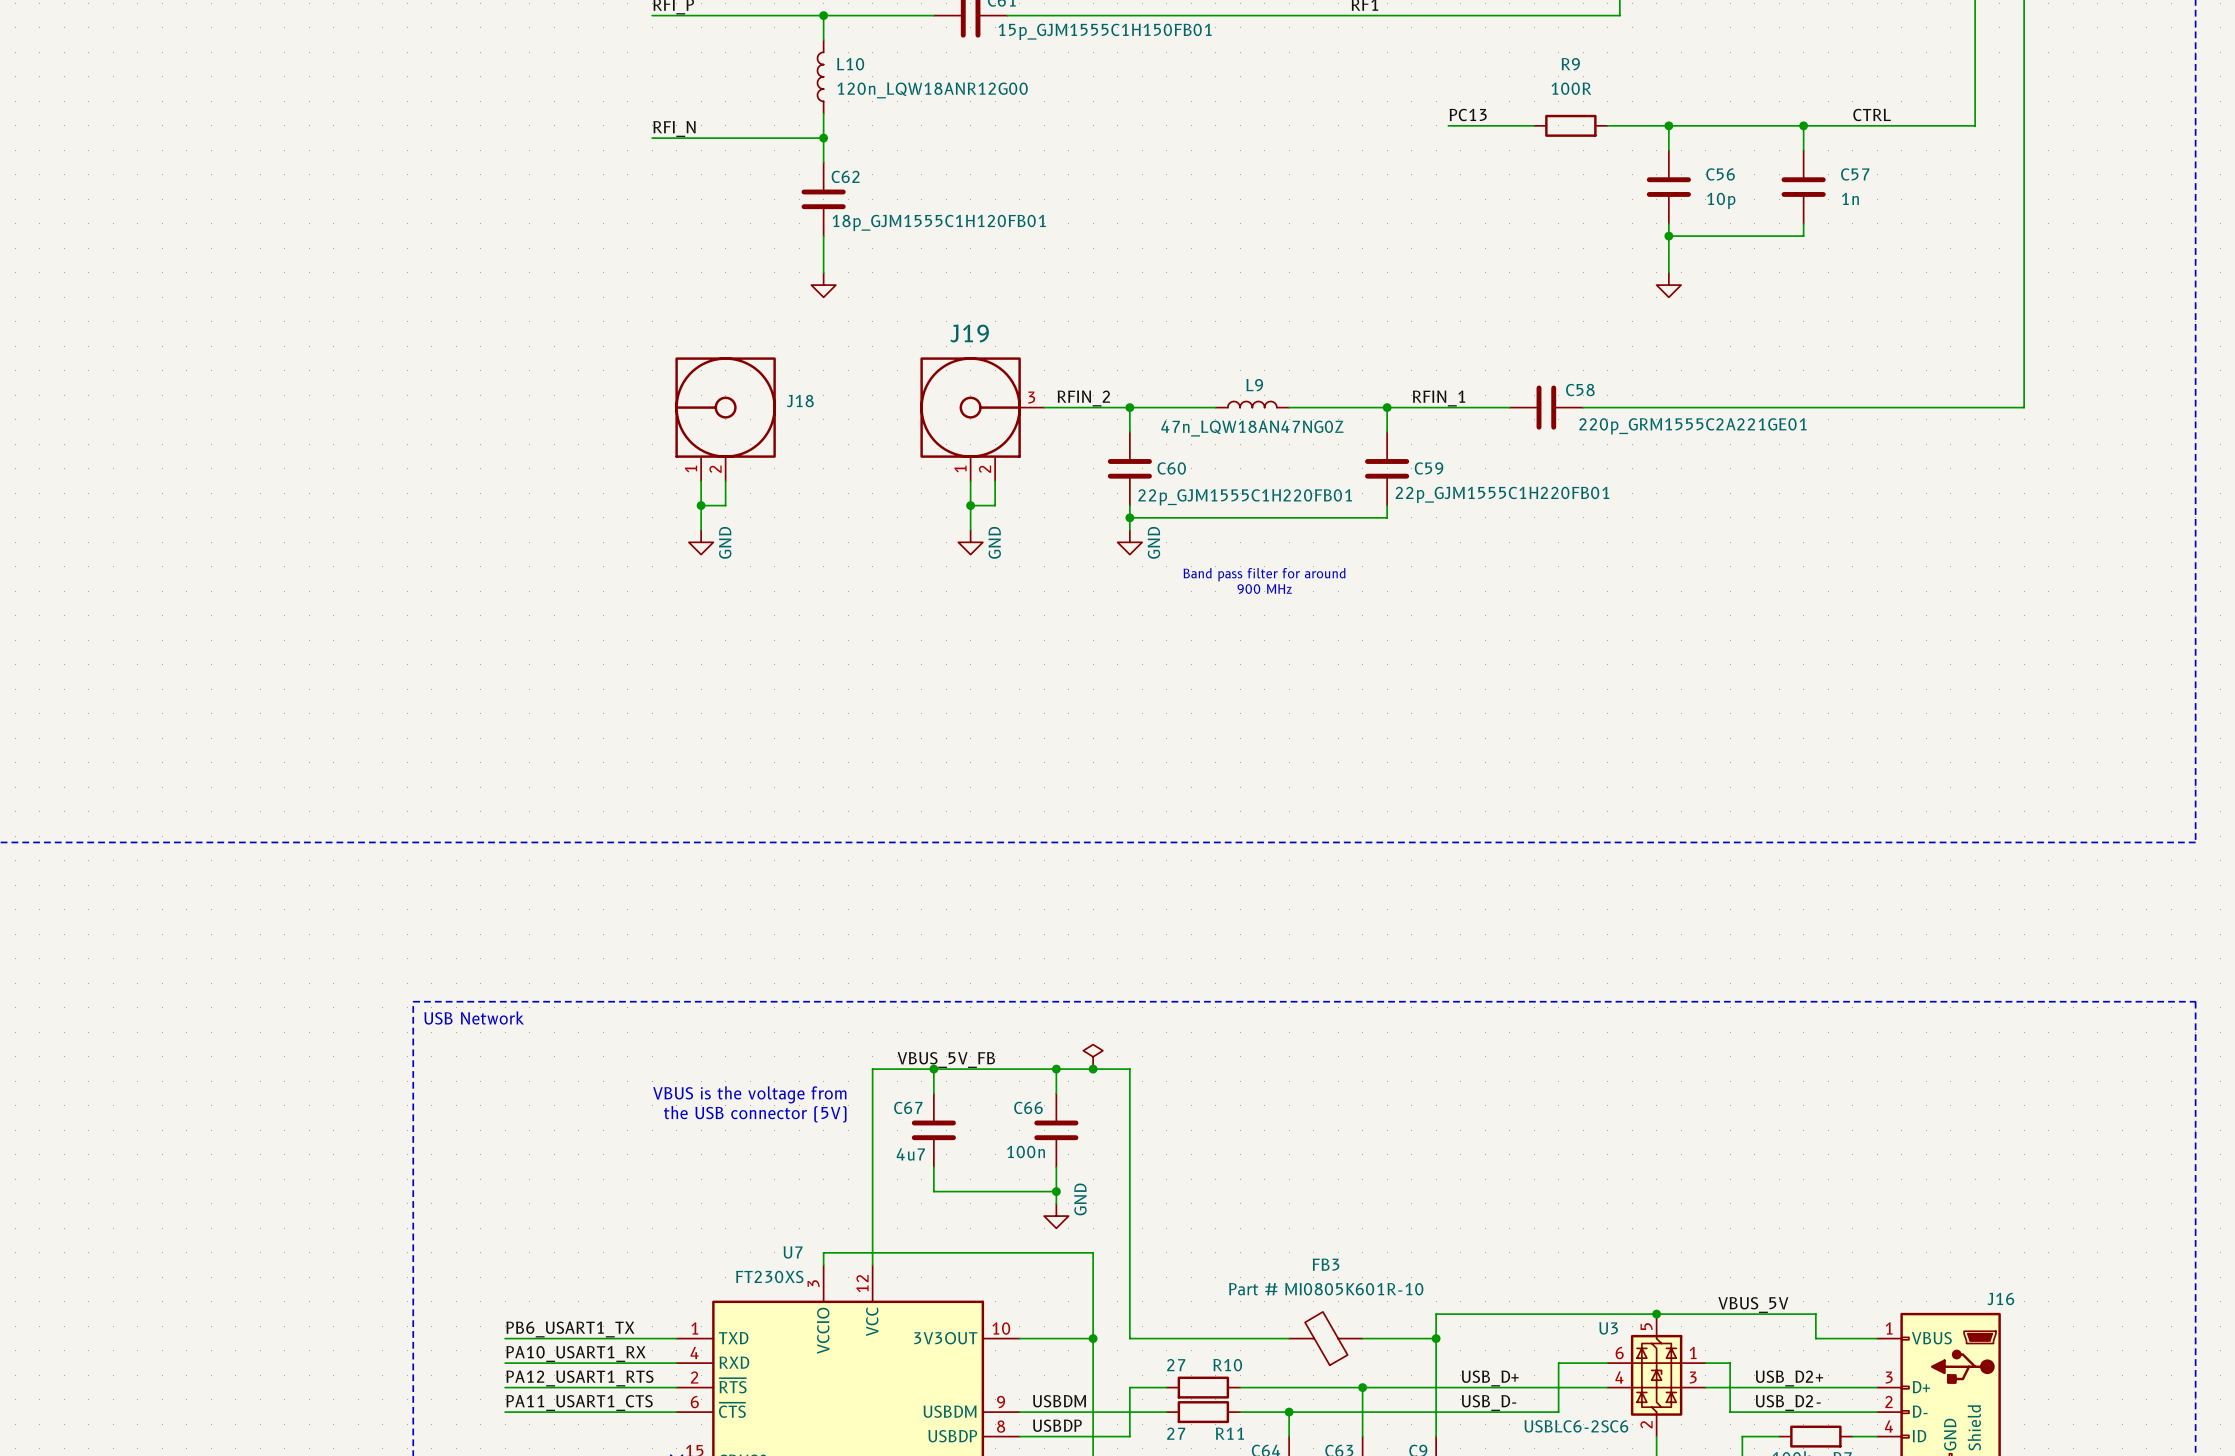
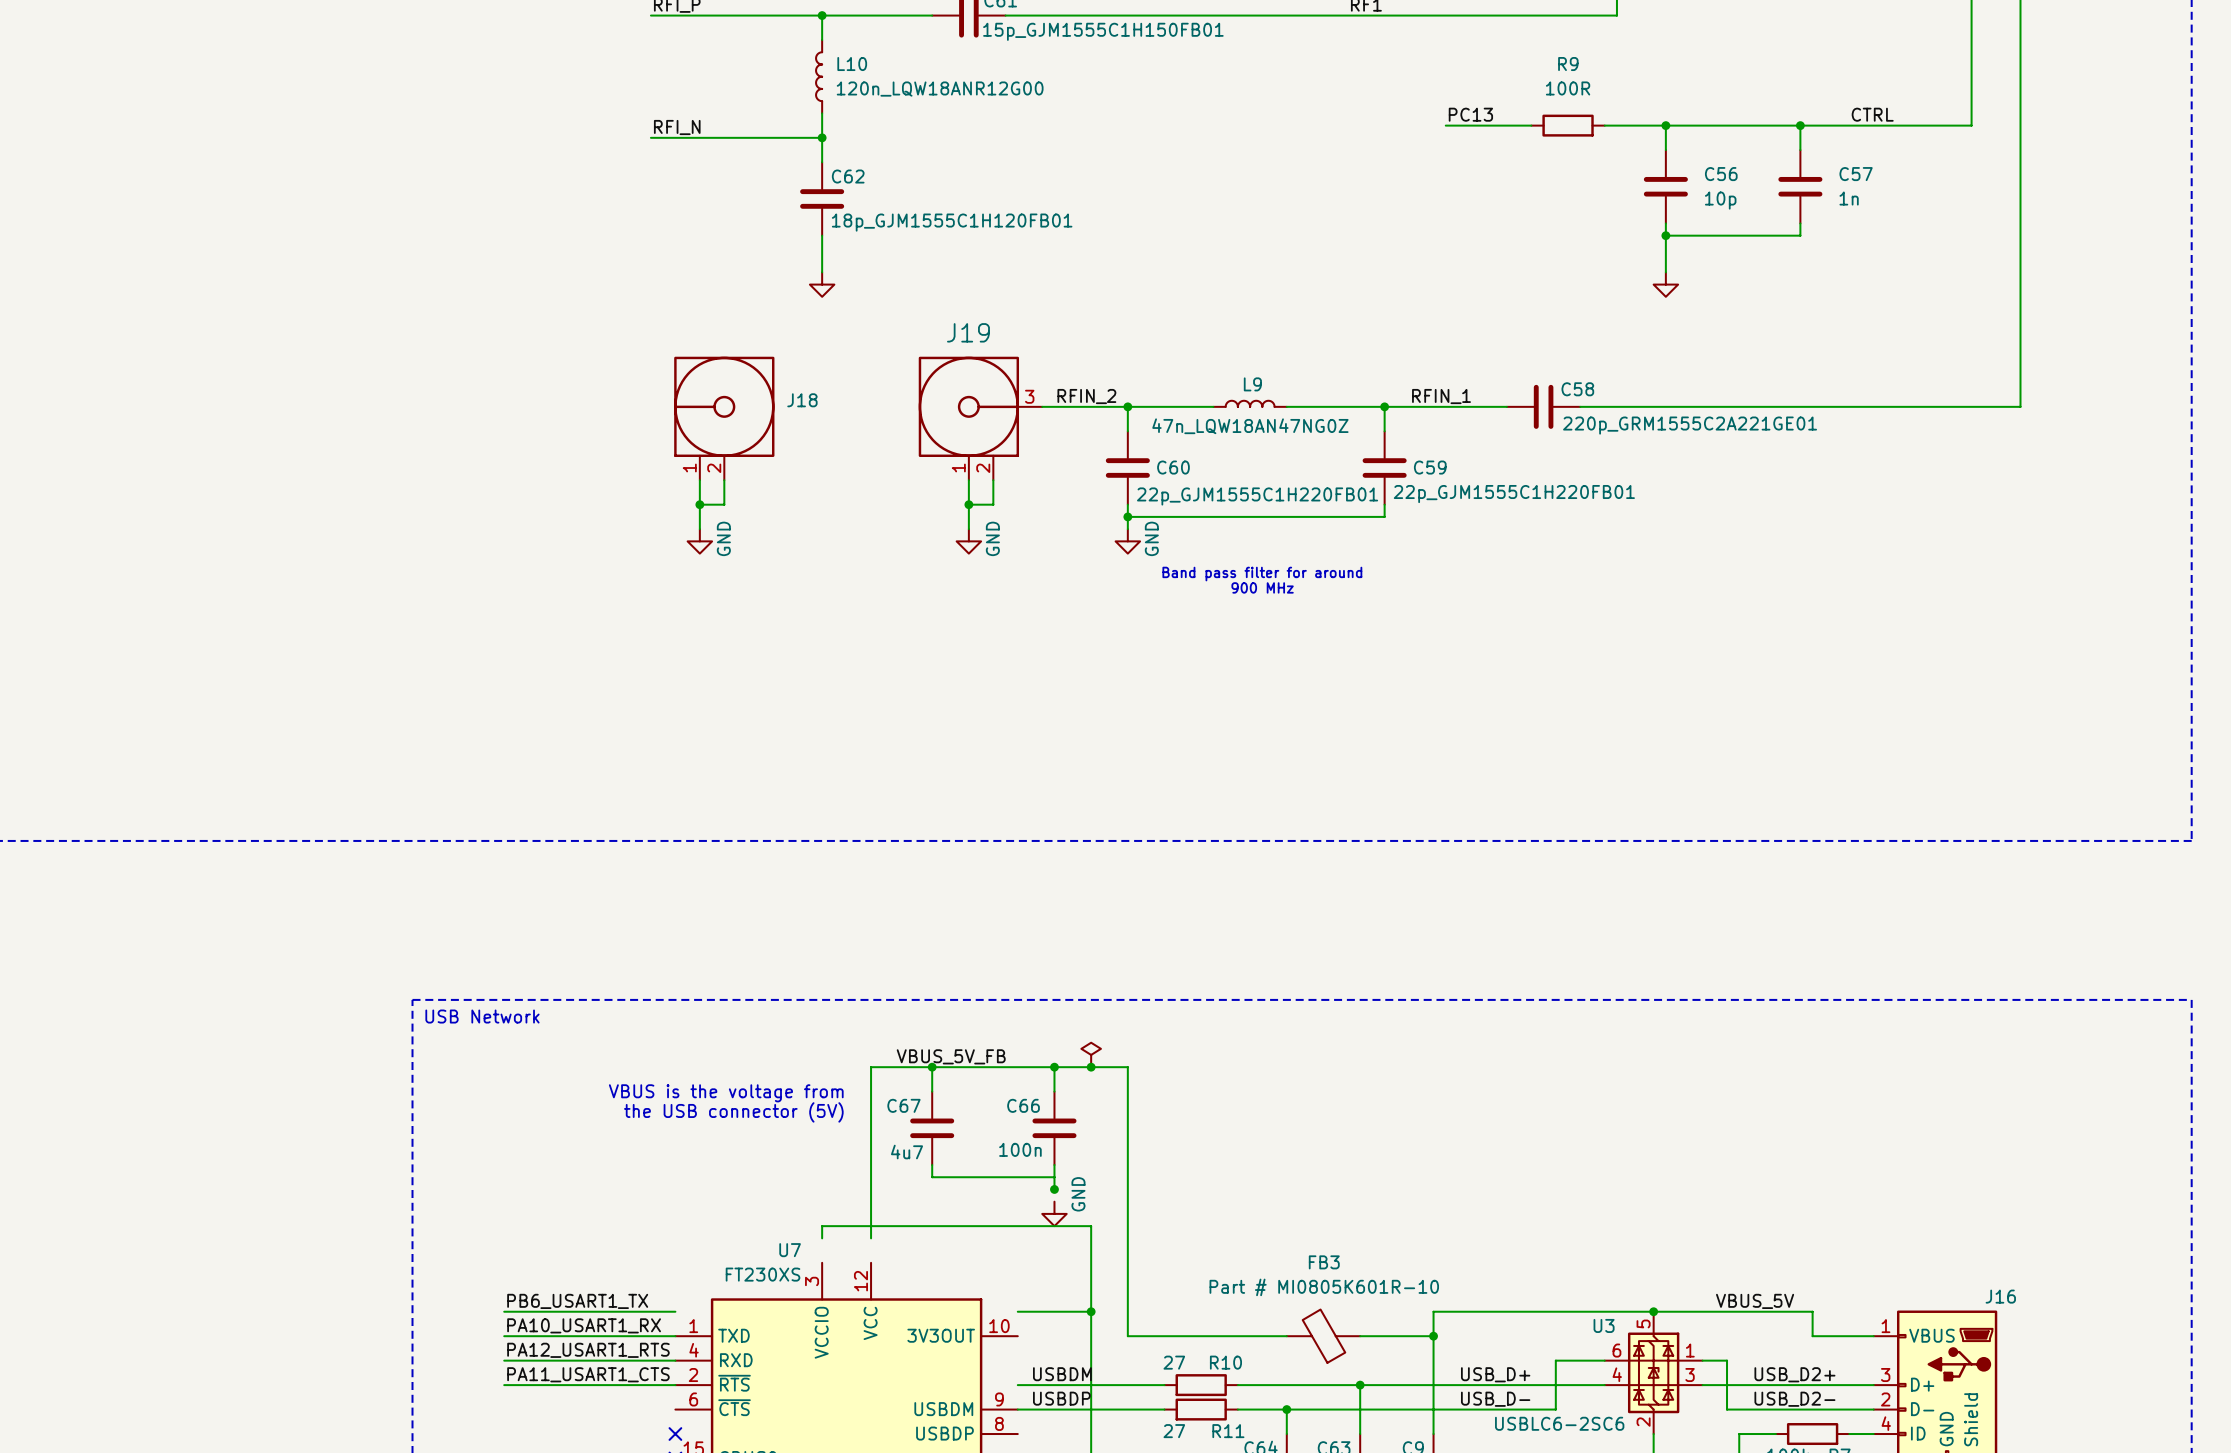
wire: (933, 1179) (933, 1191) (1056, 1191) (1056, 1203) -> (932, 1177) (1054, 1177)
wire: (872, 1240) (872, 1265) -> none
wire: (1093, 1252) (823, 1252) (823, 1265) -> (1091, 1250) (1091, 1226) (822, 1226) (822, 1238)
label: none -> PB6_USART1_TX (577, 1301)
label: PB6_USART1_TX (570, 1329) -> PA10_USART1_RX (584, 1325)
wire: (1019, 1338) (1093, 1338) -> (1017, 1311) (1091, 1311)
junction position: (1093, 1338) -> (1091, 1311)
label: PA10_USART1_RX (575, 1353) -> PA12_USART1_RTS (588, 1350)
label: none -> USBDM (1062, 1374)
label: PA12_USART1_RTS (579, 1378) -> PA11_USART1_CTS (588, 1374)
wire: (1129, 1387) (1129, 1436) (1019, 1436) -> (1127, 1385) (1017, 1385)
label: USBDM (1059, 1401) -> USBDP (1061, 1398)
label: PA11_USART1_CTS (579, 1402) -> none
wire: (505, 1412) (676, 1412) -> (504, 1311) (675, 1311)
label: USBDP (1057, 1425) -> none
no-connect mark: none -> (675, 1434)

